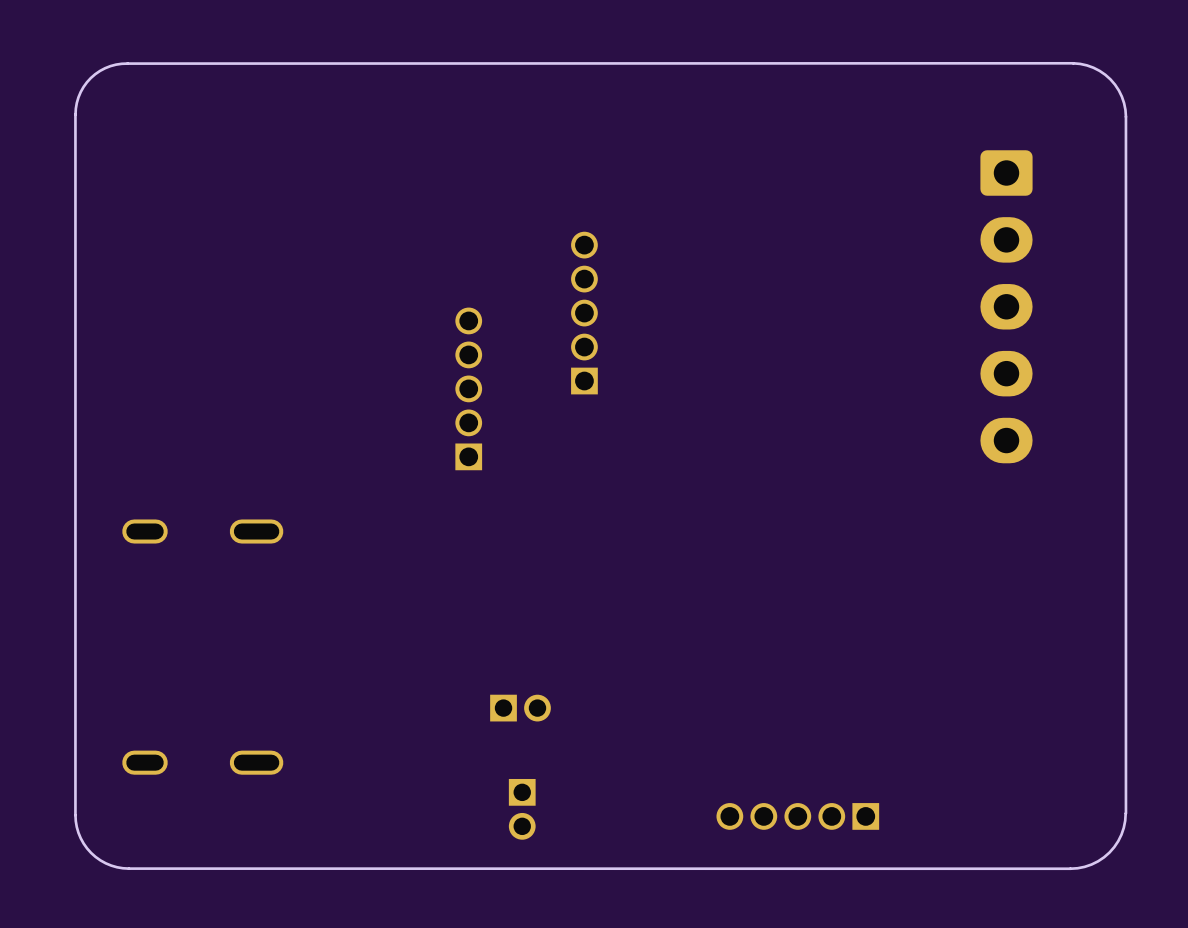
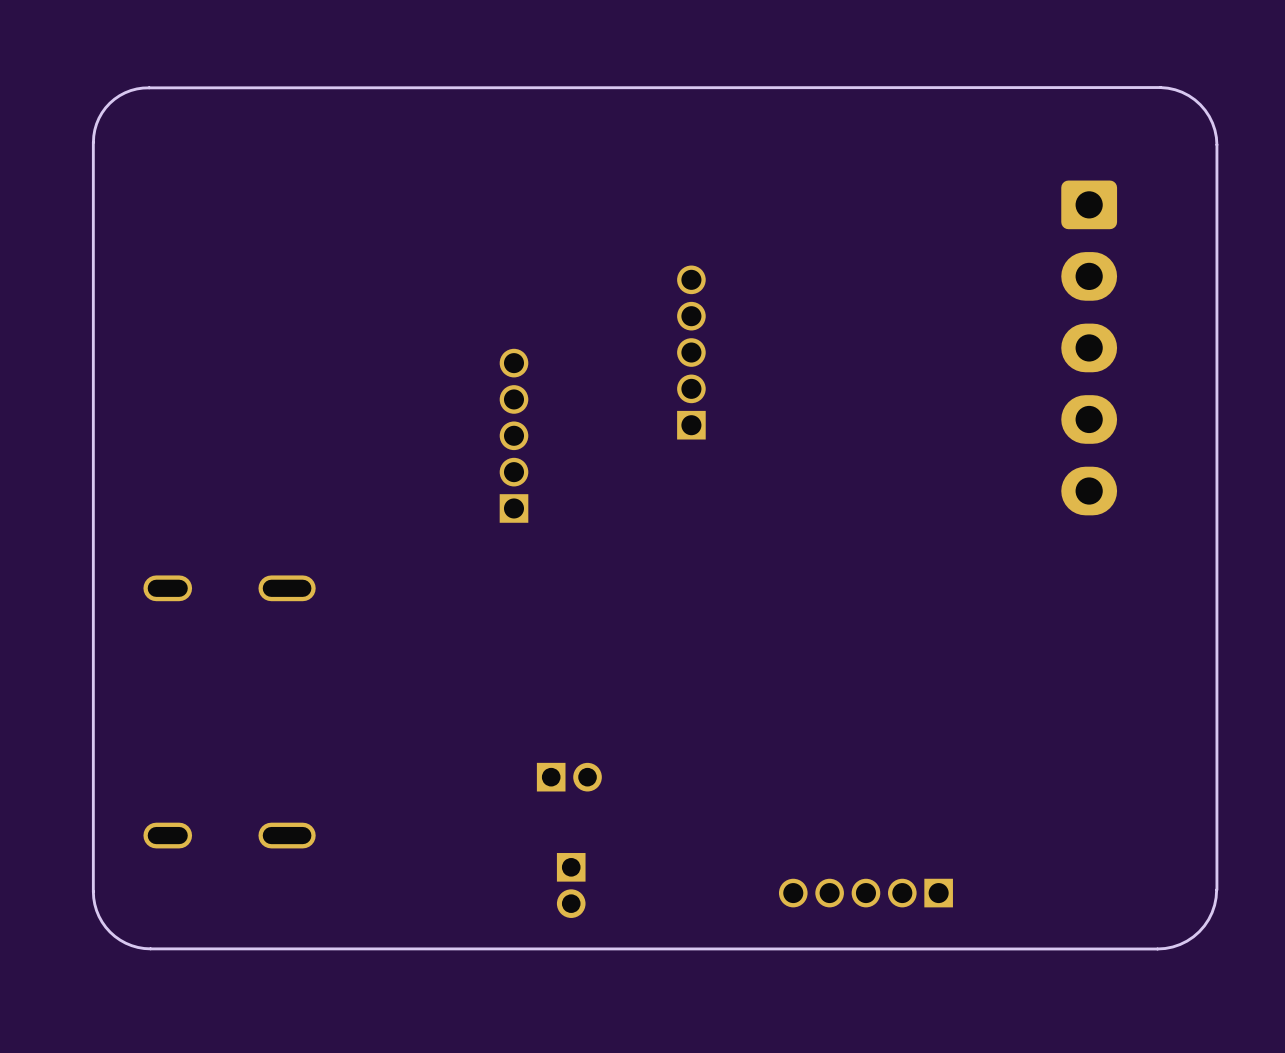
part position: (584, 313) -> (691, 352)

